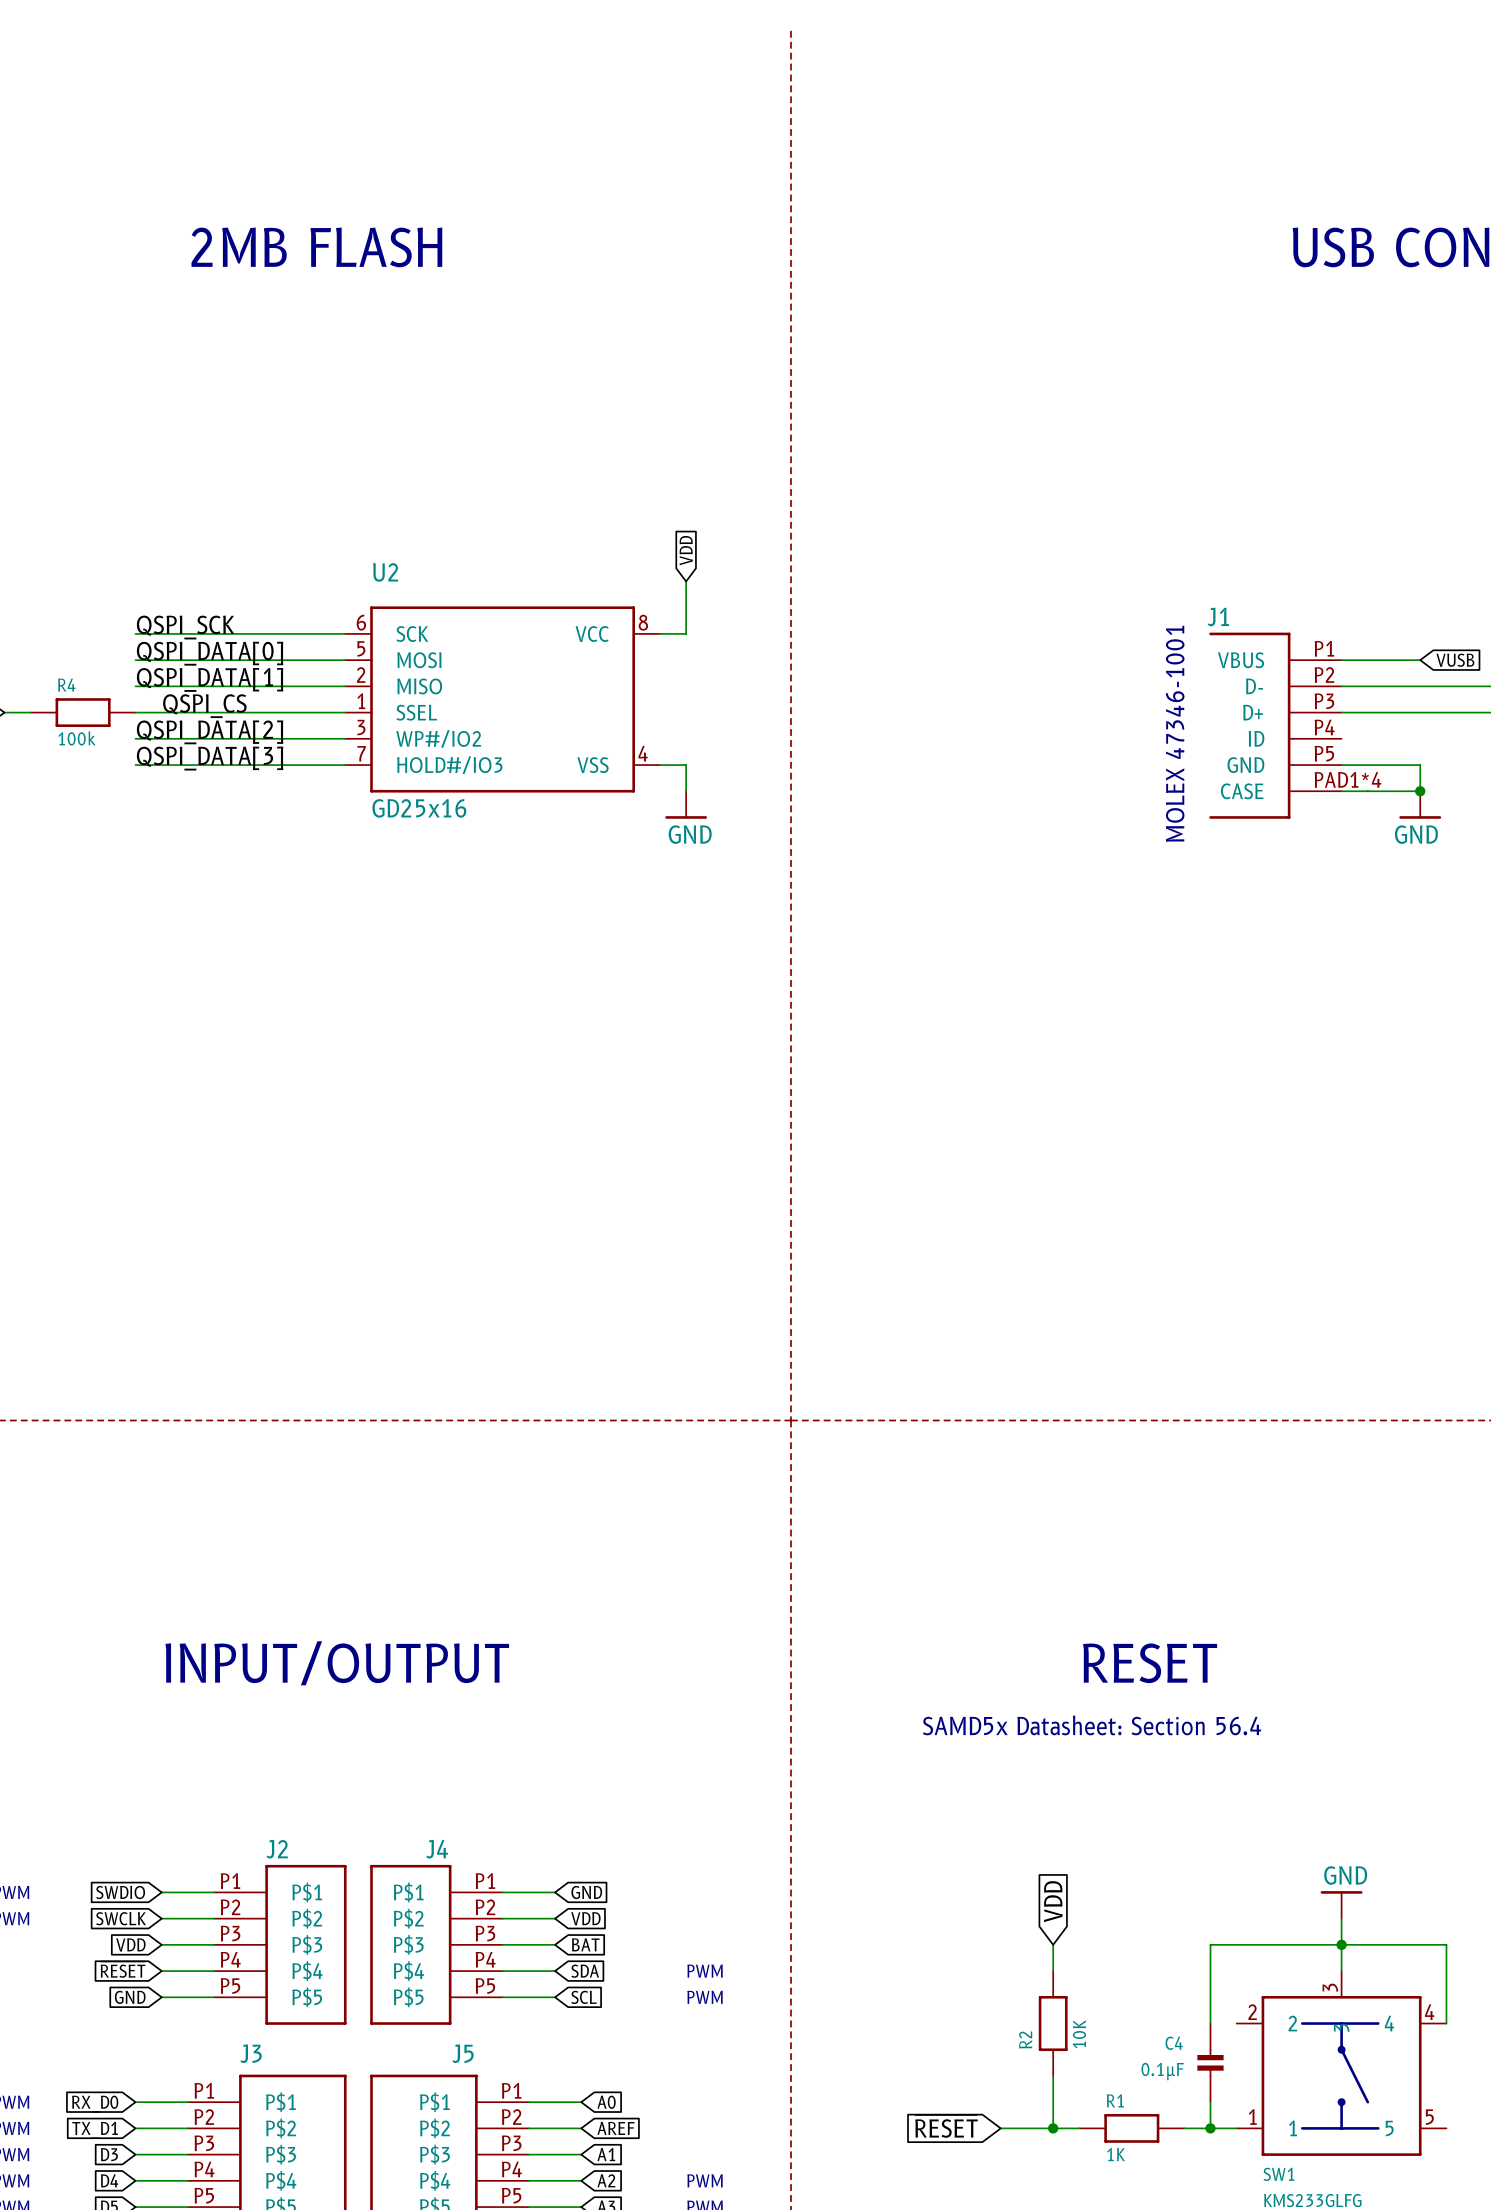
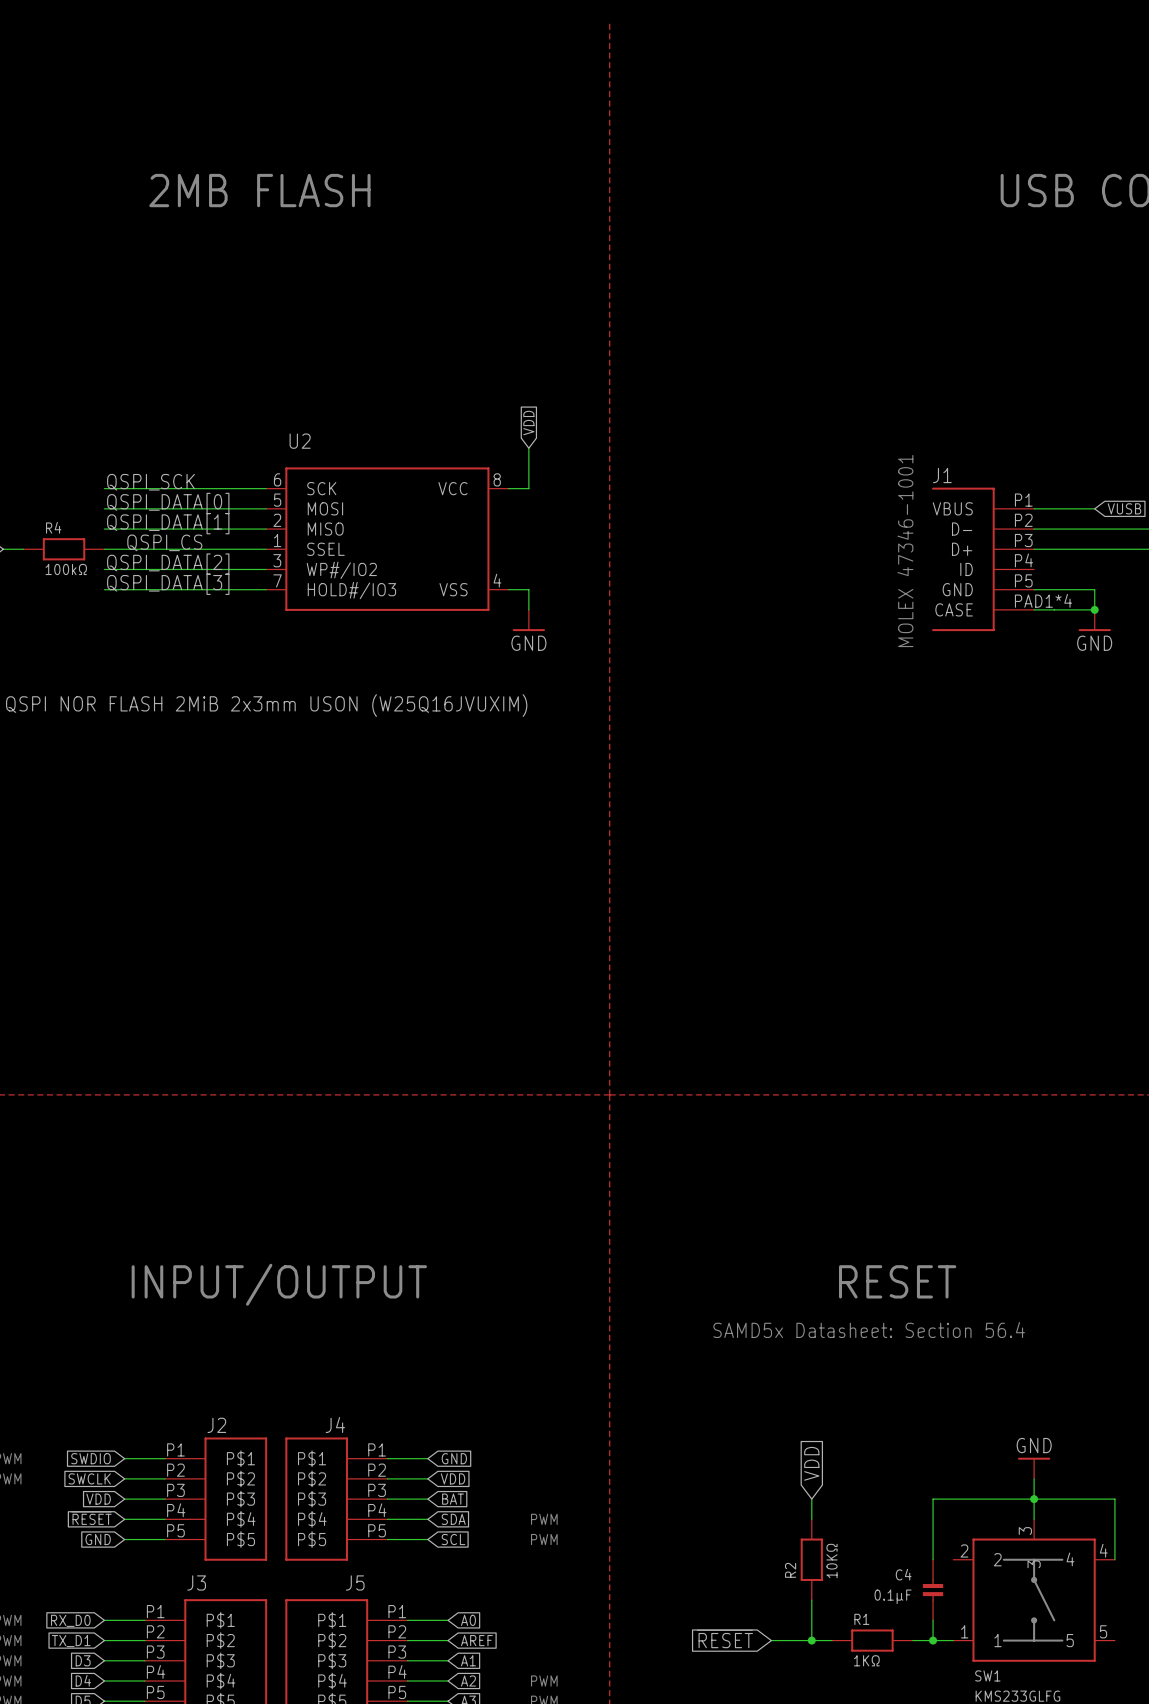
R4 value: 100k (77, 738) -> 100kΩ (66, 569)
U2 value: GD25x16 (419, 808) -> QSPI NOR FLASH 2MiB 2x3mm USON (W25Q16JVUXIM) (266, 705)
R2 value: 10K (1079, 2034) -> 10KΩ (832, 1561)
R1 value: 1K (1116, 2154) -> 1KΩ (866, 1660)

